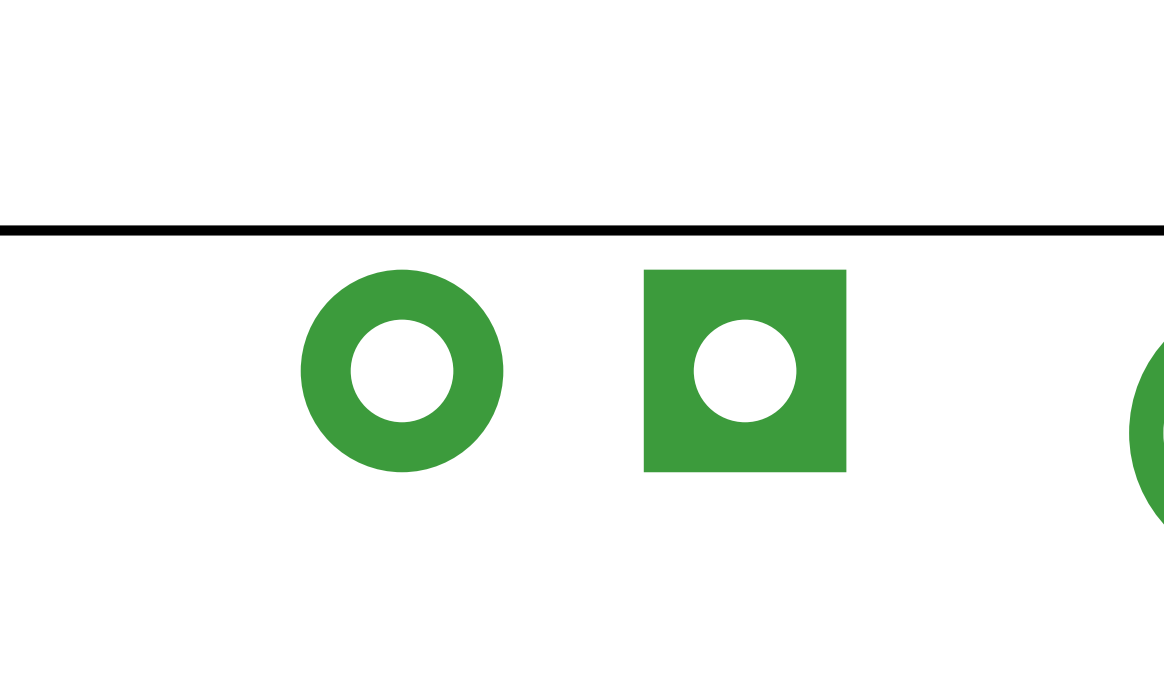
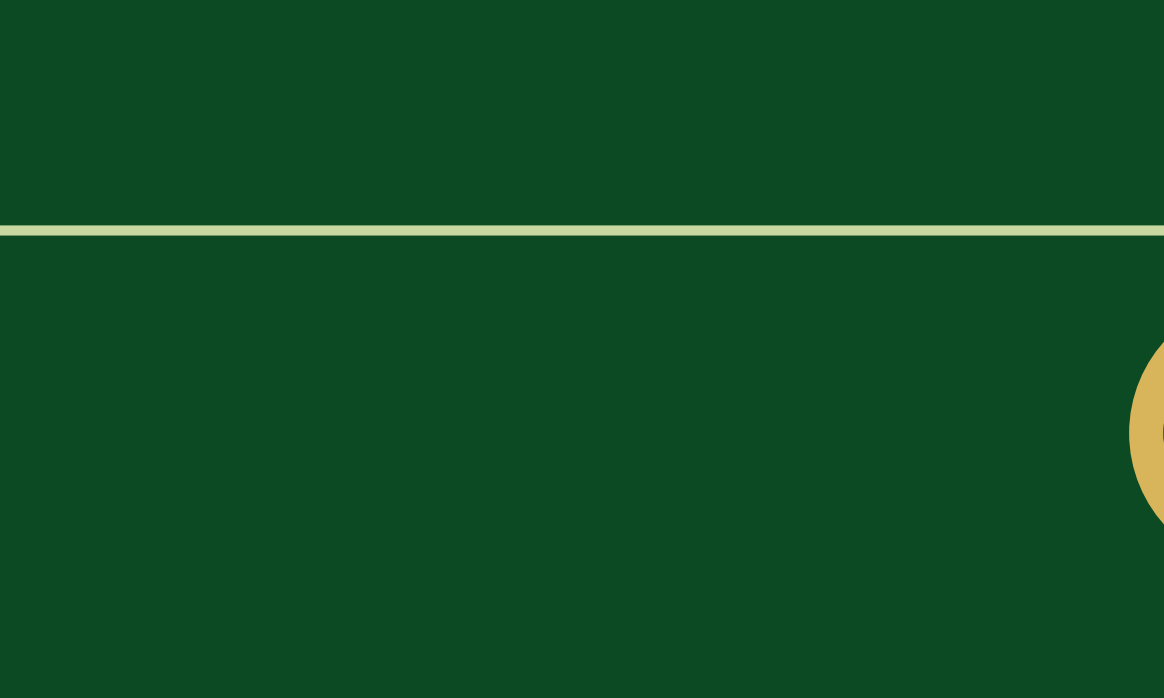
part: (573, 370) -> none

